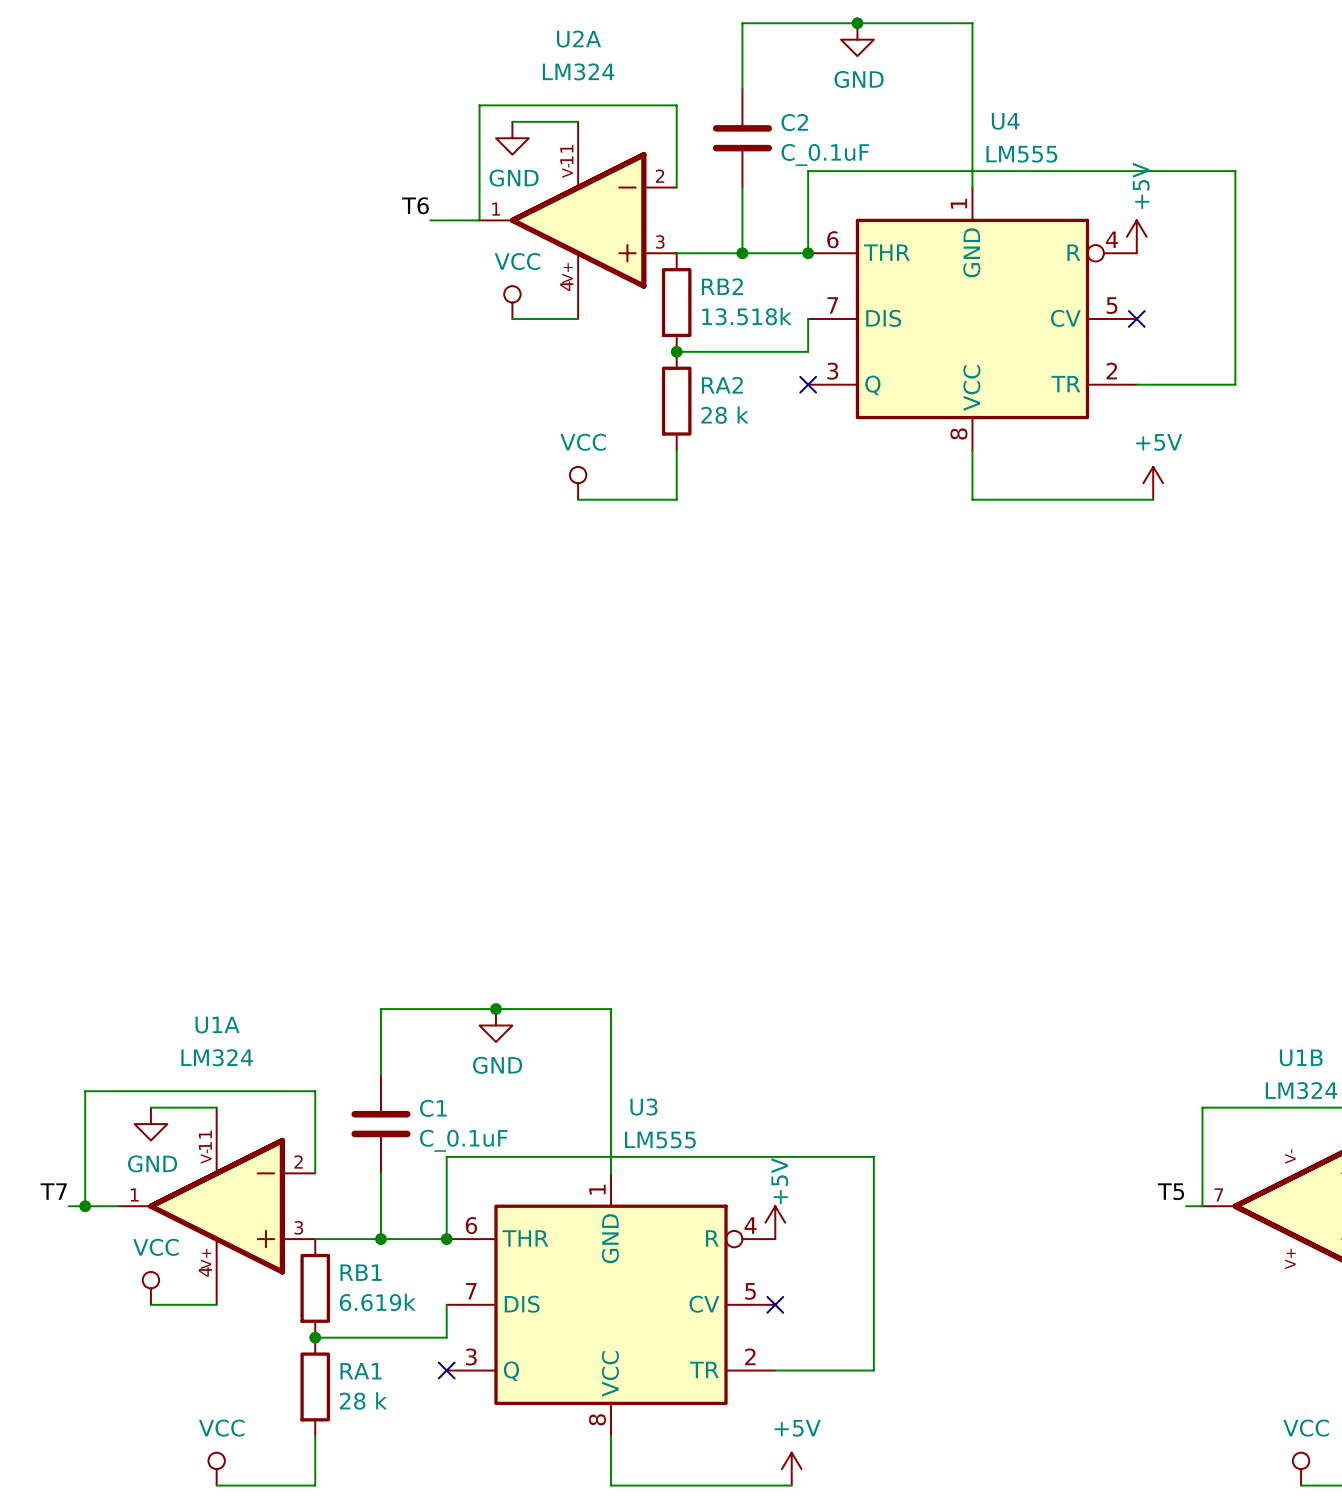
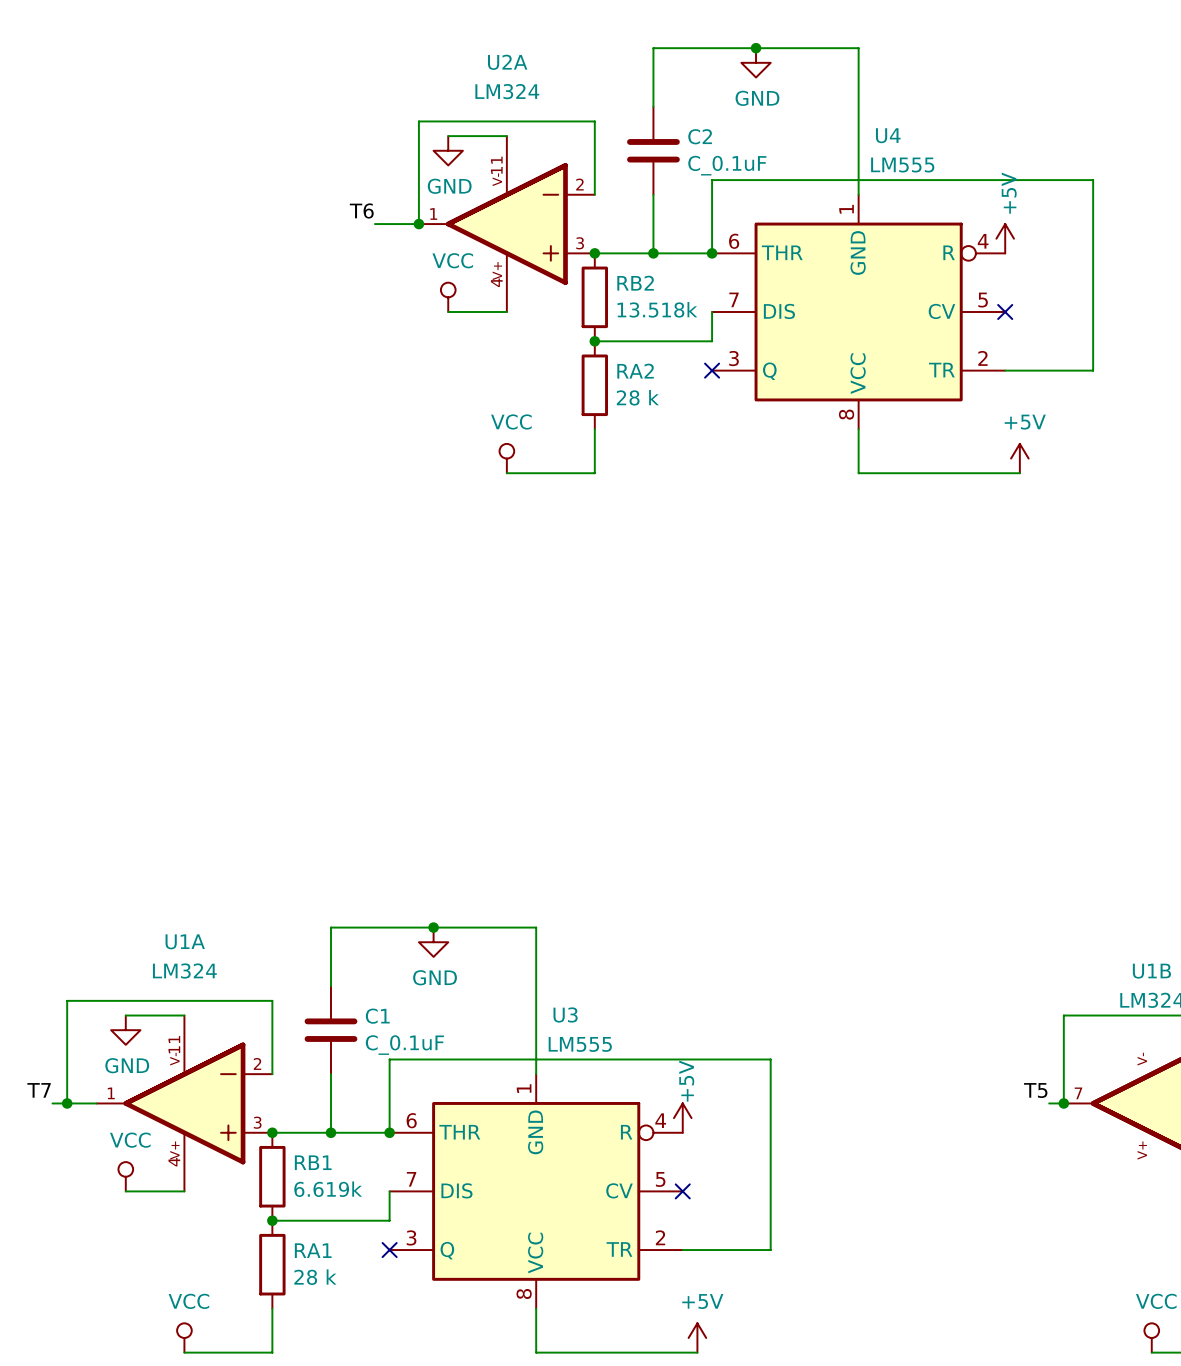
junction: none -> (418, 224)
junction: none -> (594, 253)
junction: none -> (1063, 1103)
junction: none -> (272, 1132)

